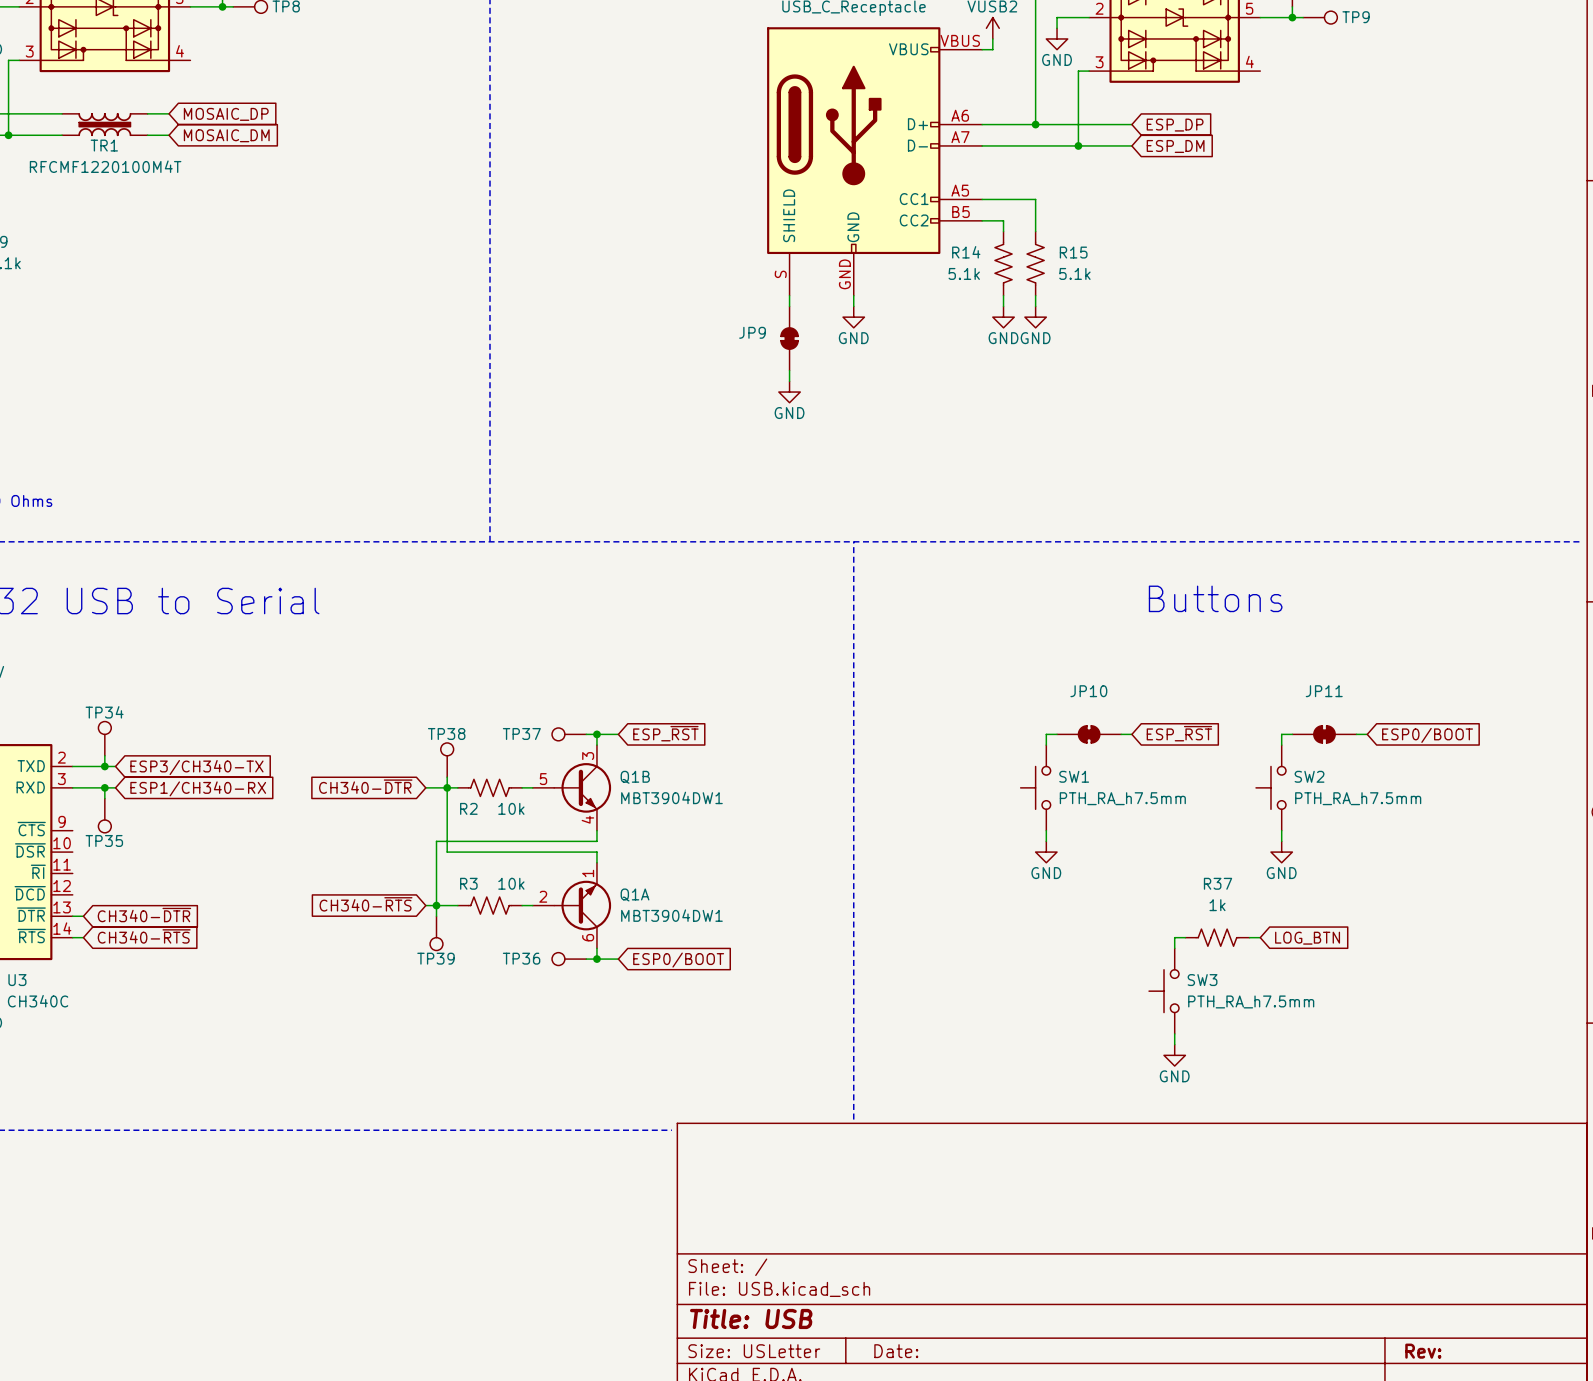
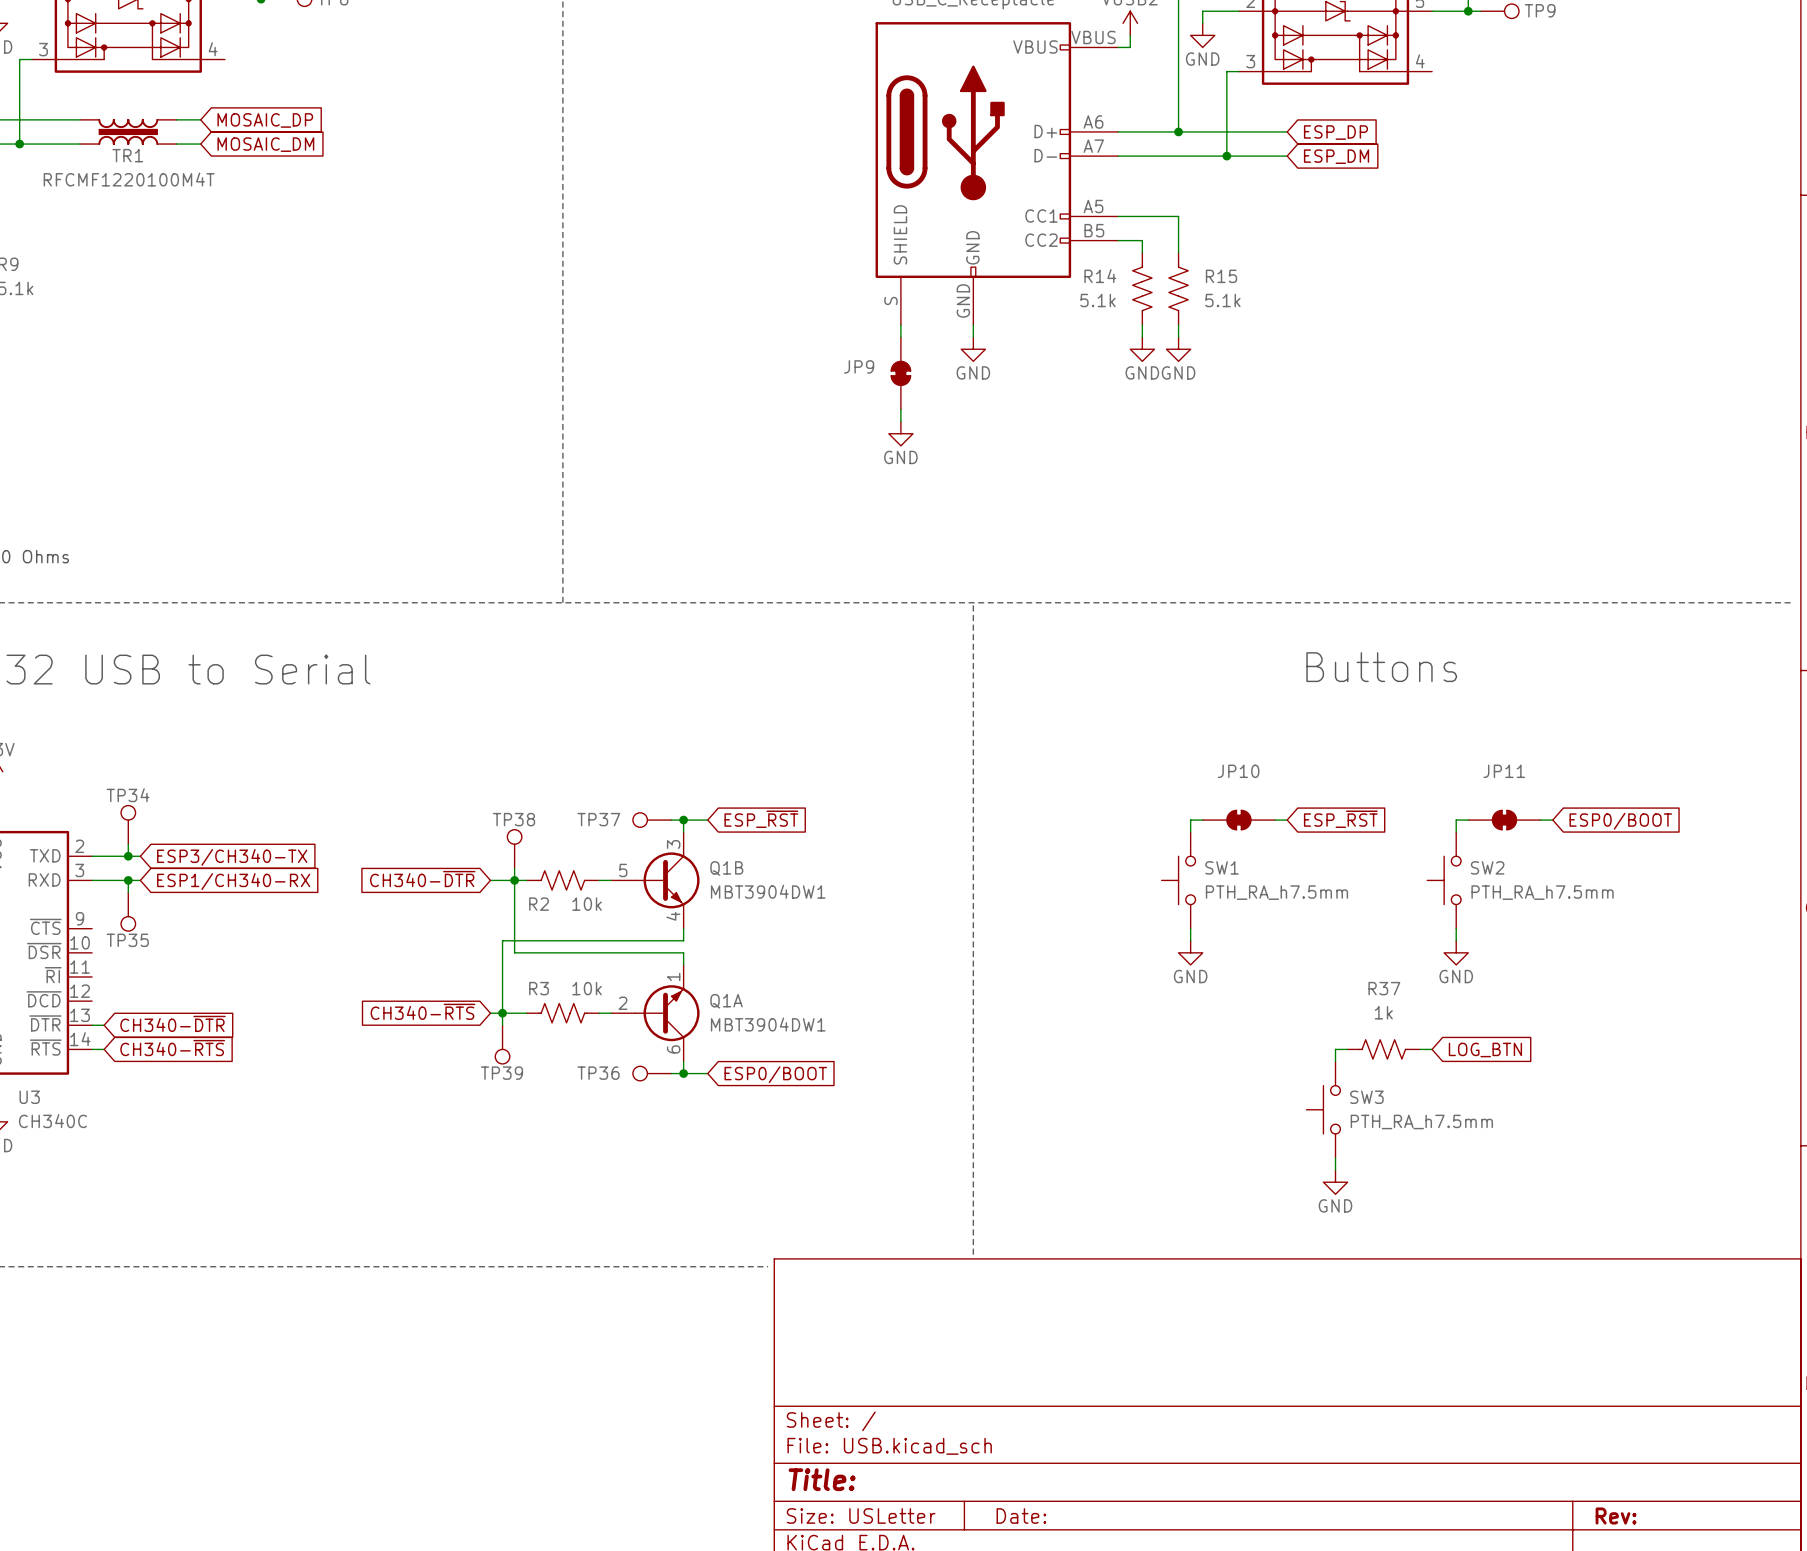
title block: Title: USB (751, 1318) -> Title: (822, 1479)

